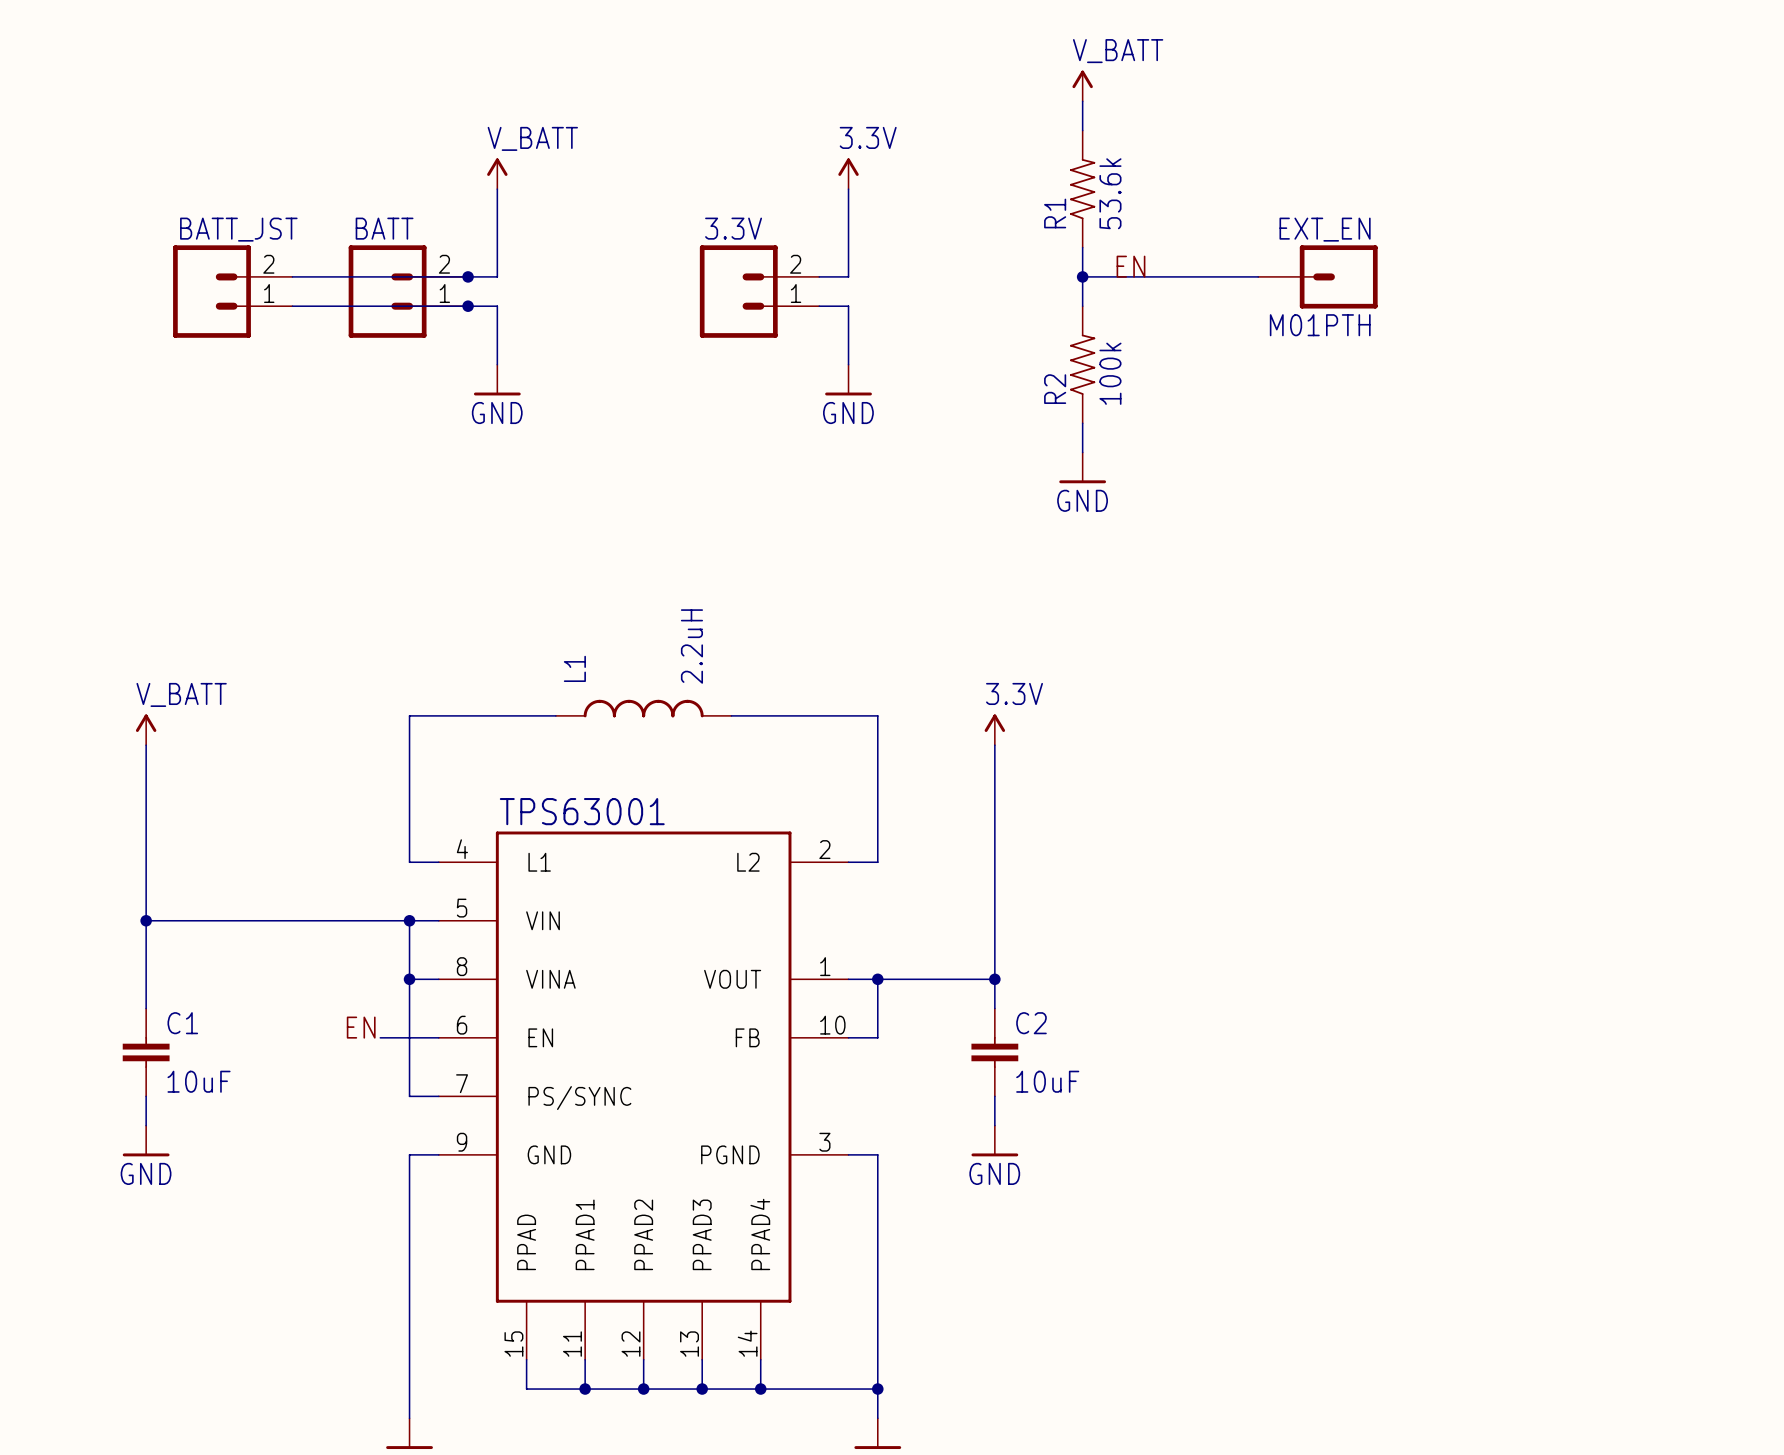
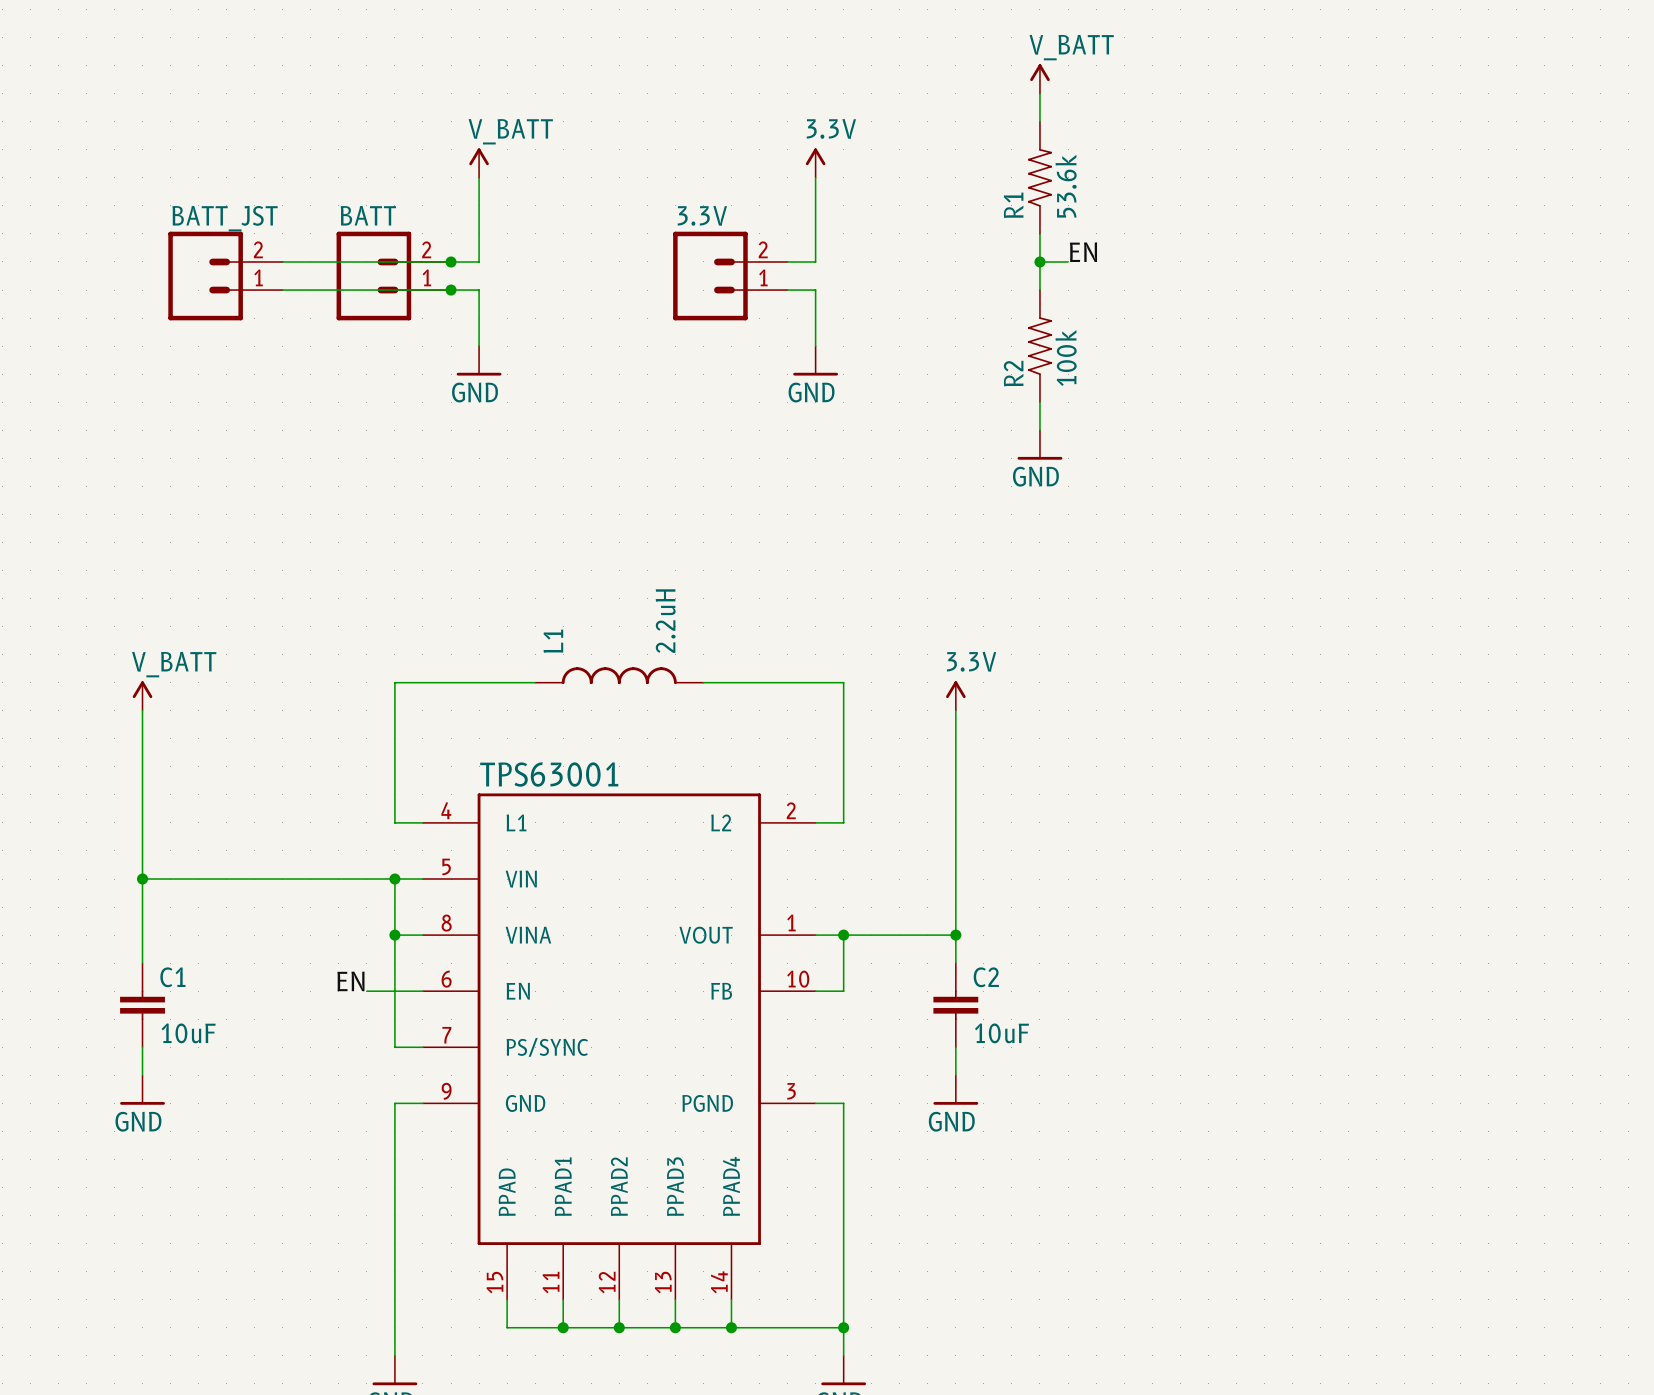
wire: (1111, 276) (1258, 276) -> none
EXT_EN: M01PTH (1317, 276) -> none

